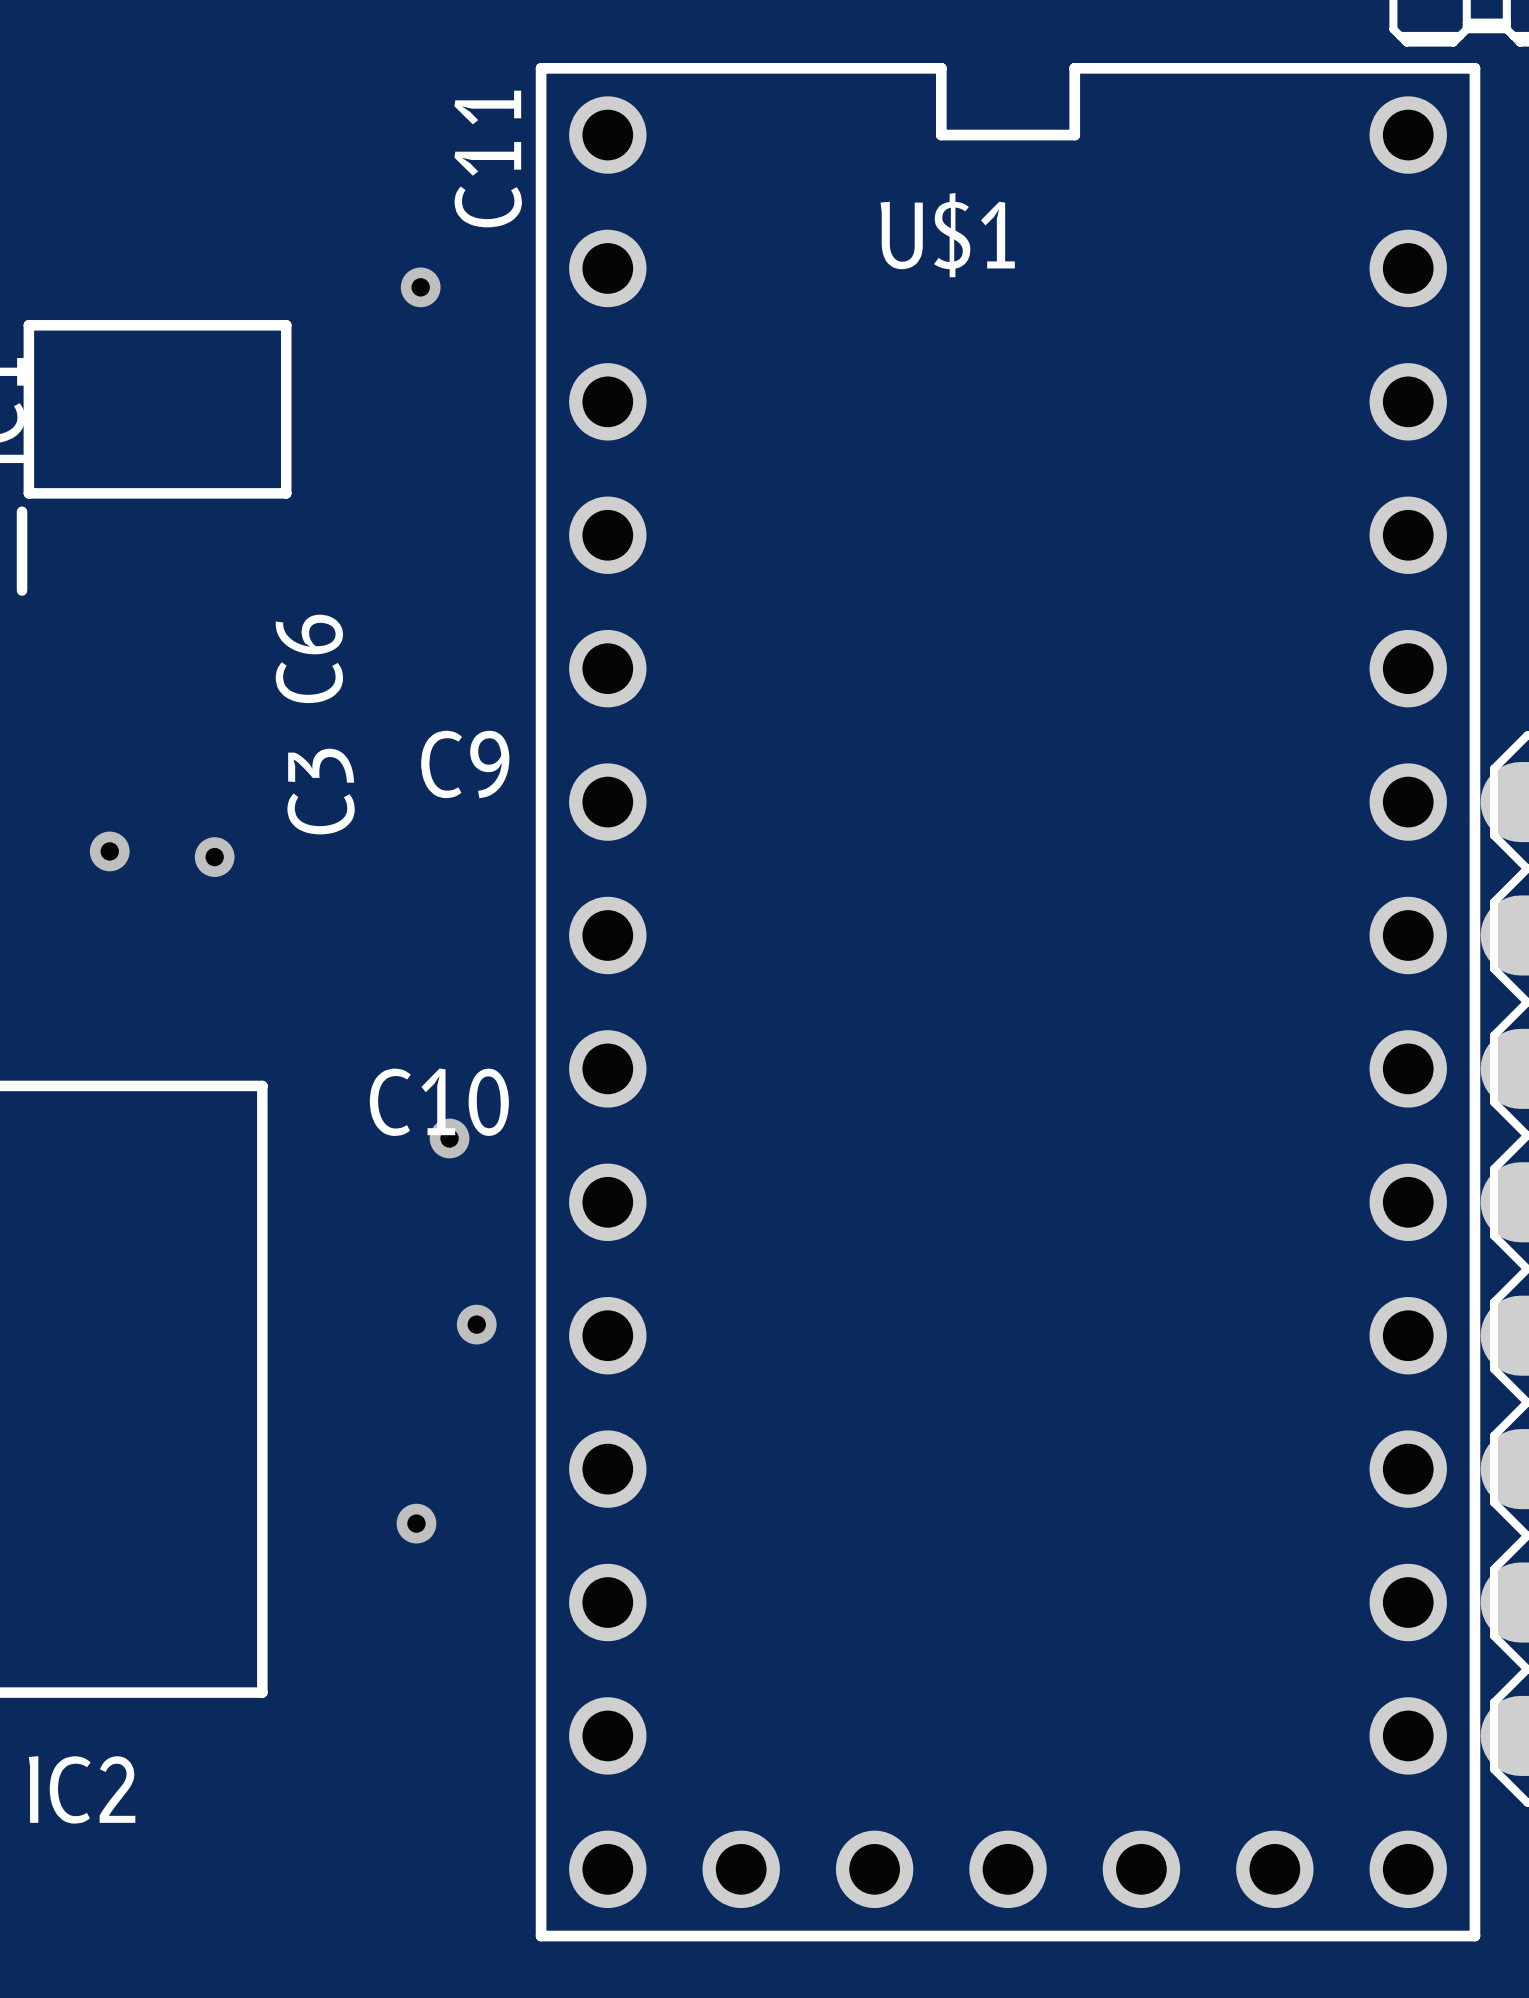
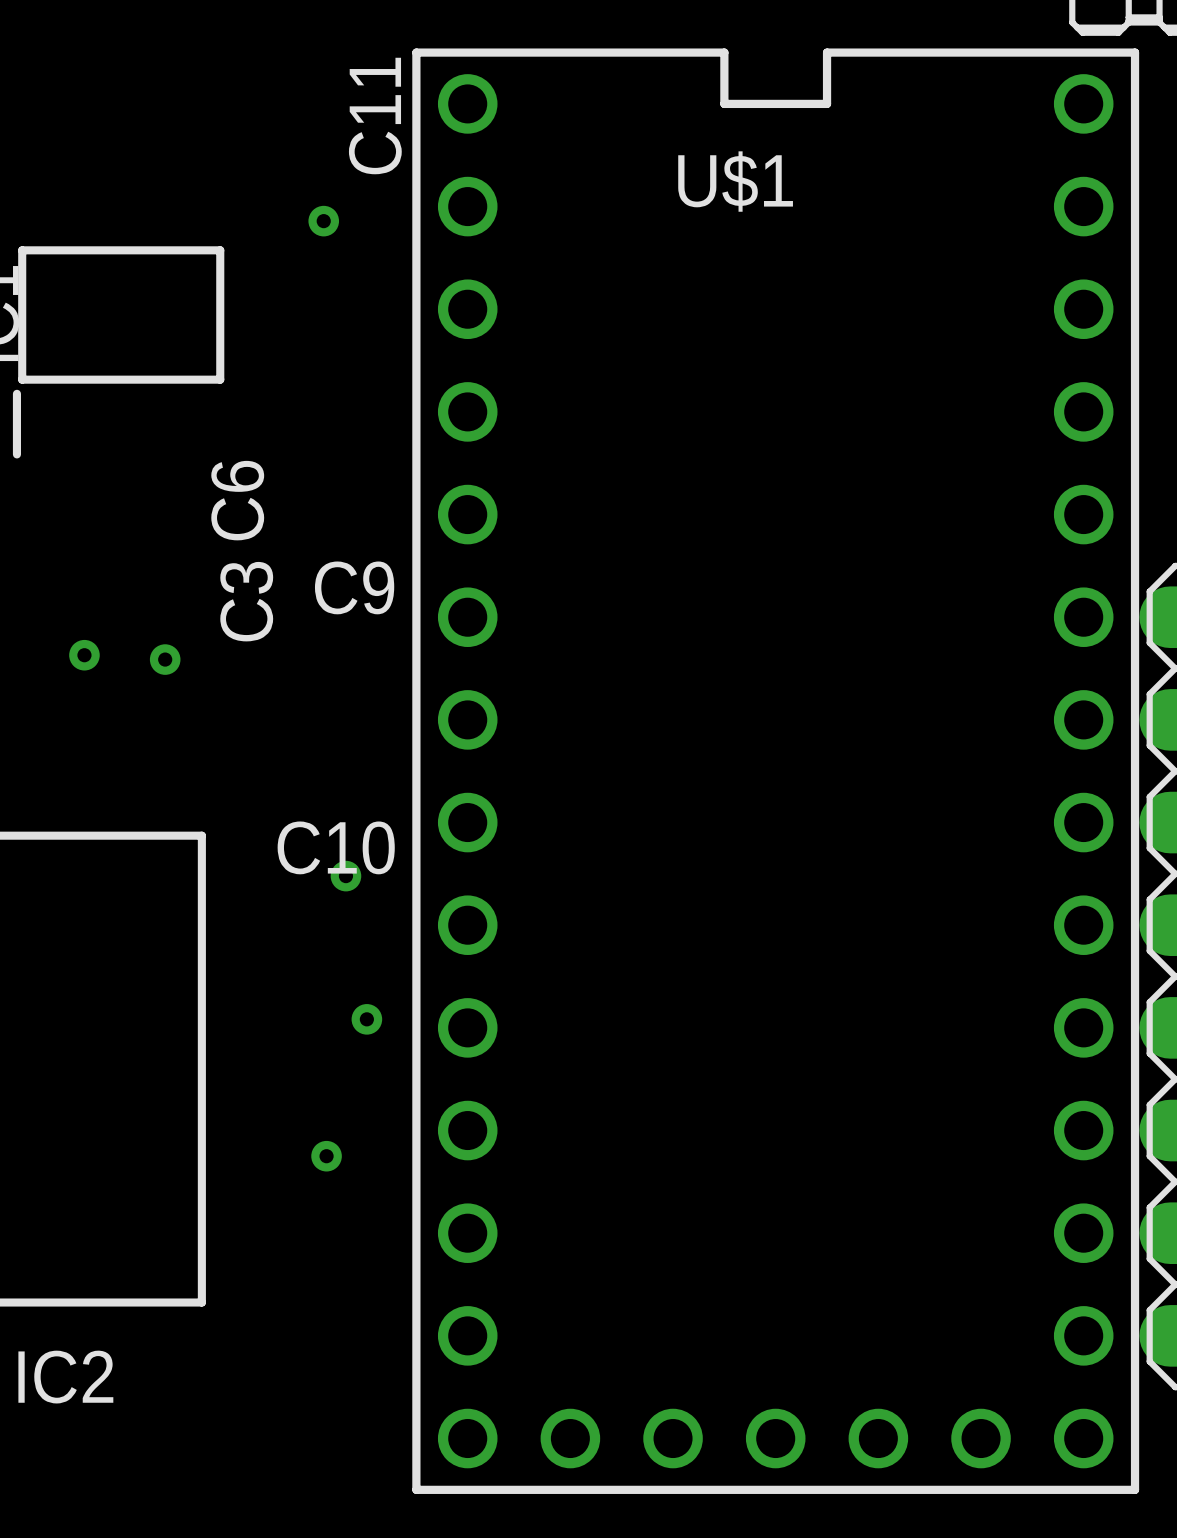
via position: (416, 1523) -> (326, 1156)

